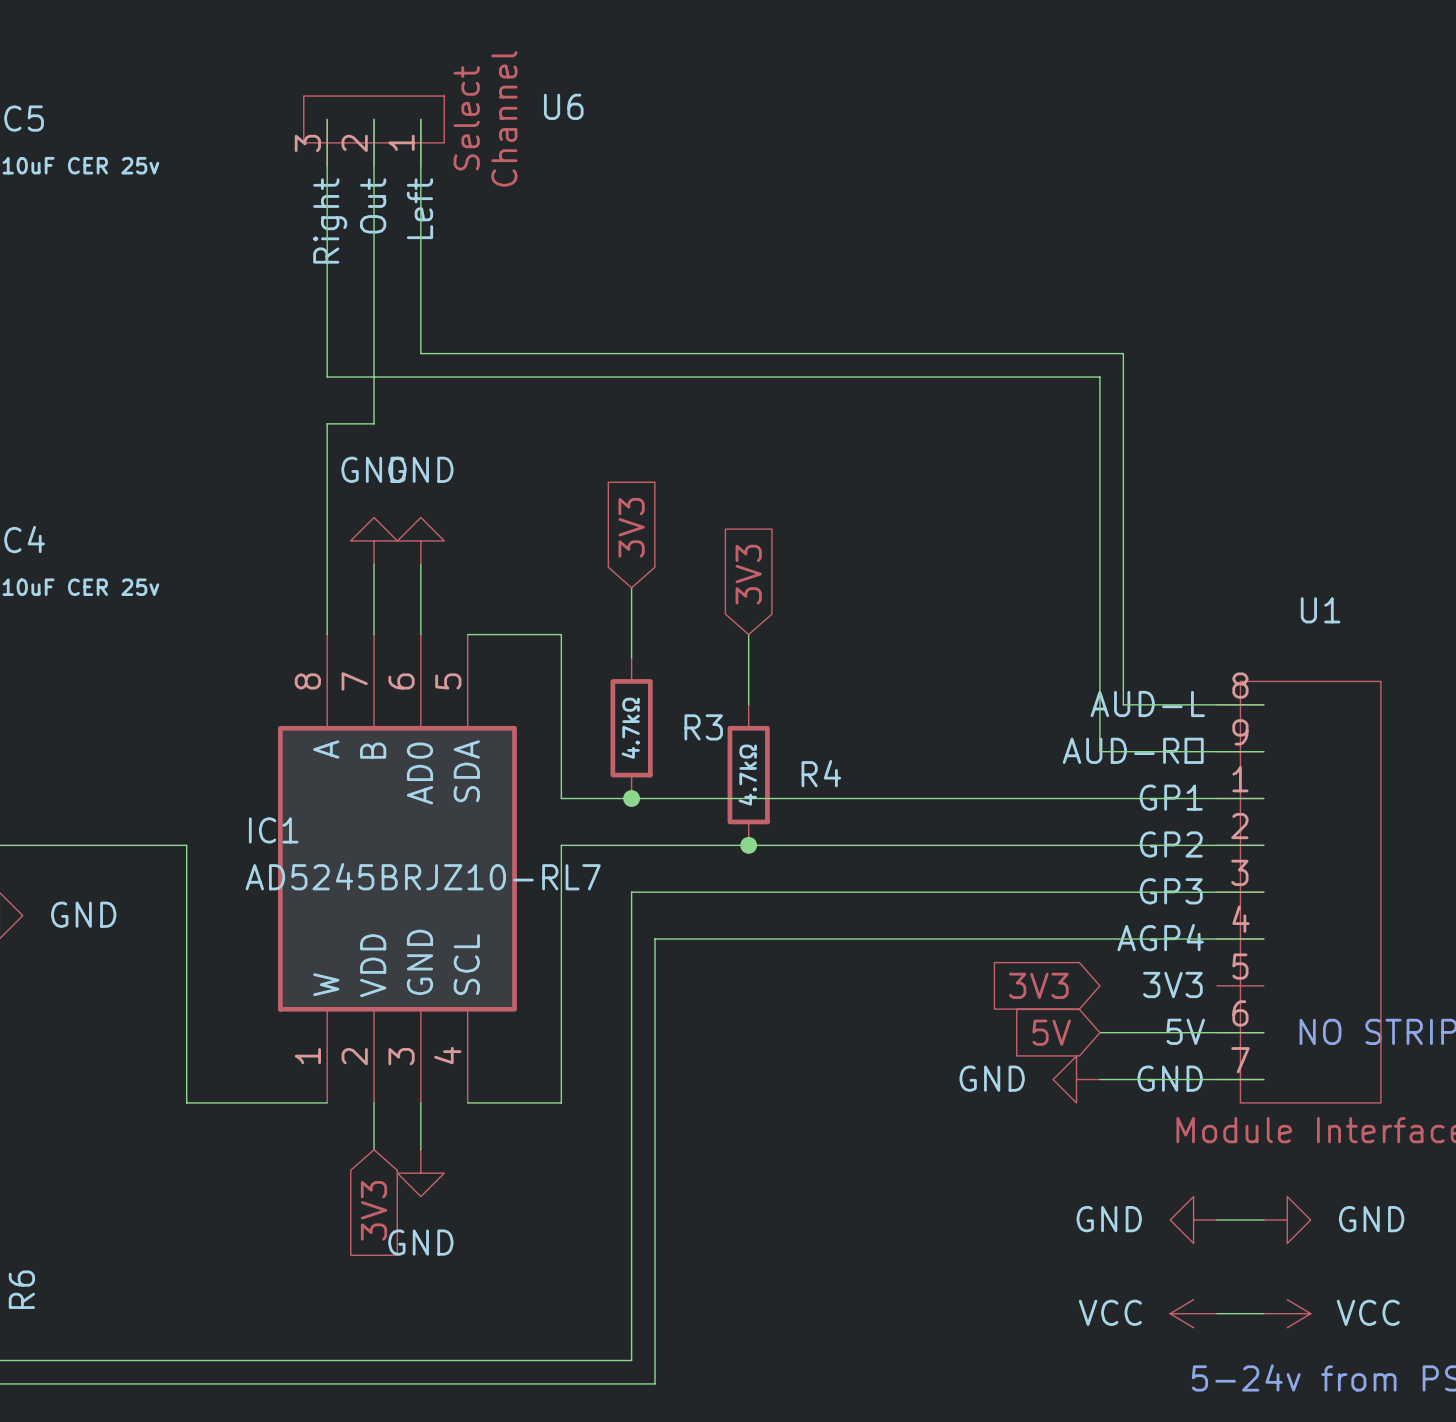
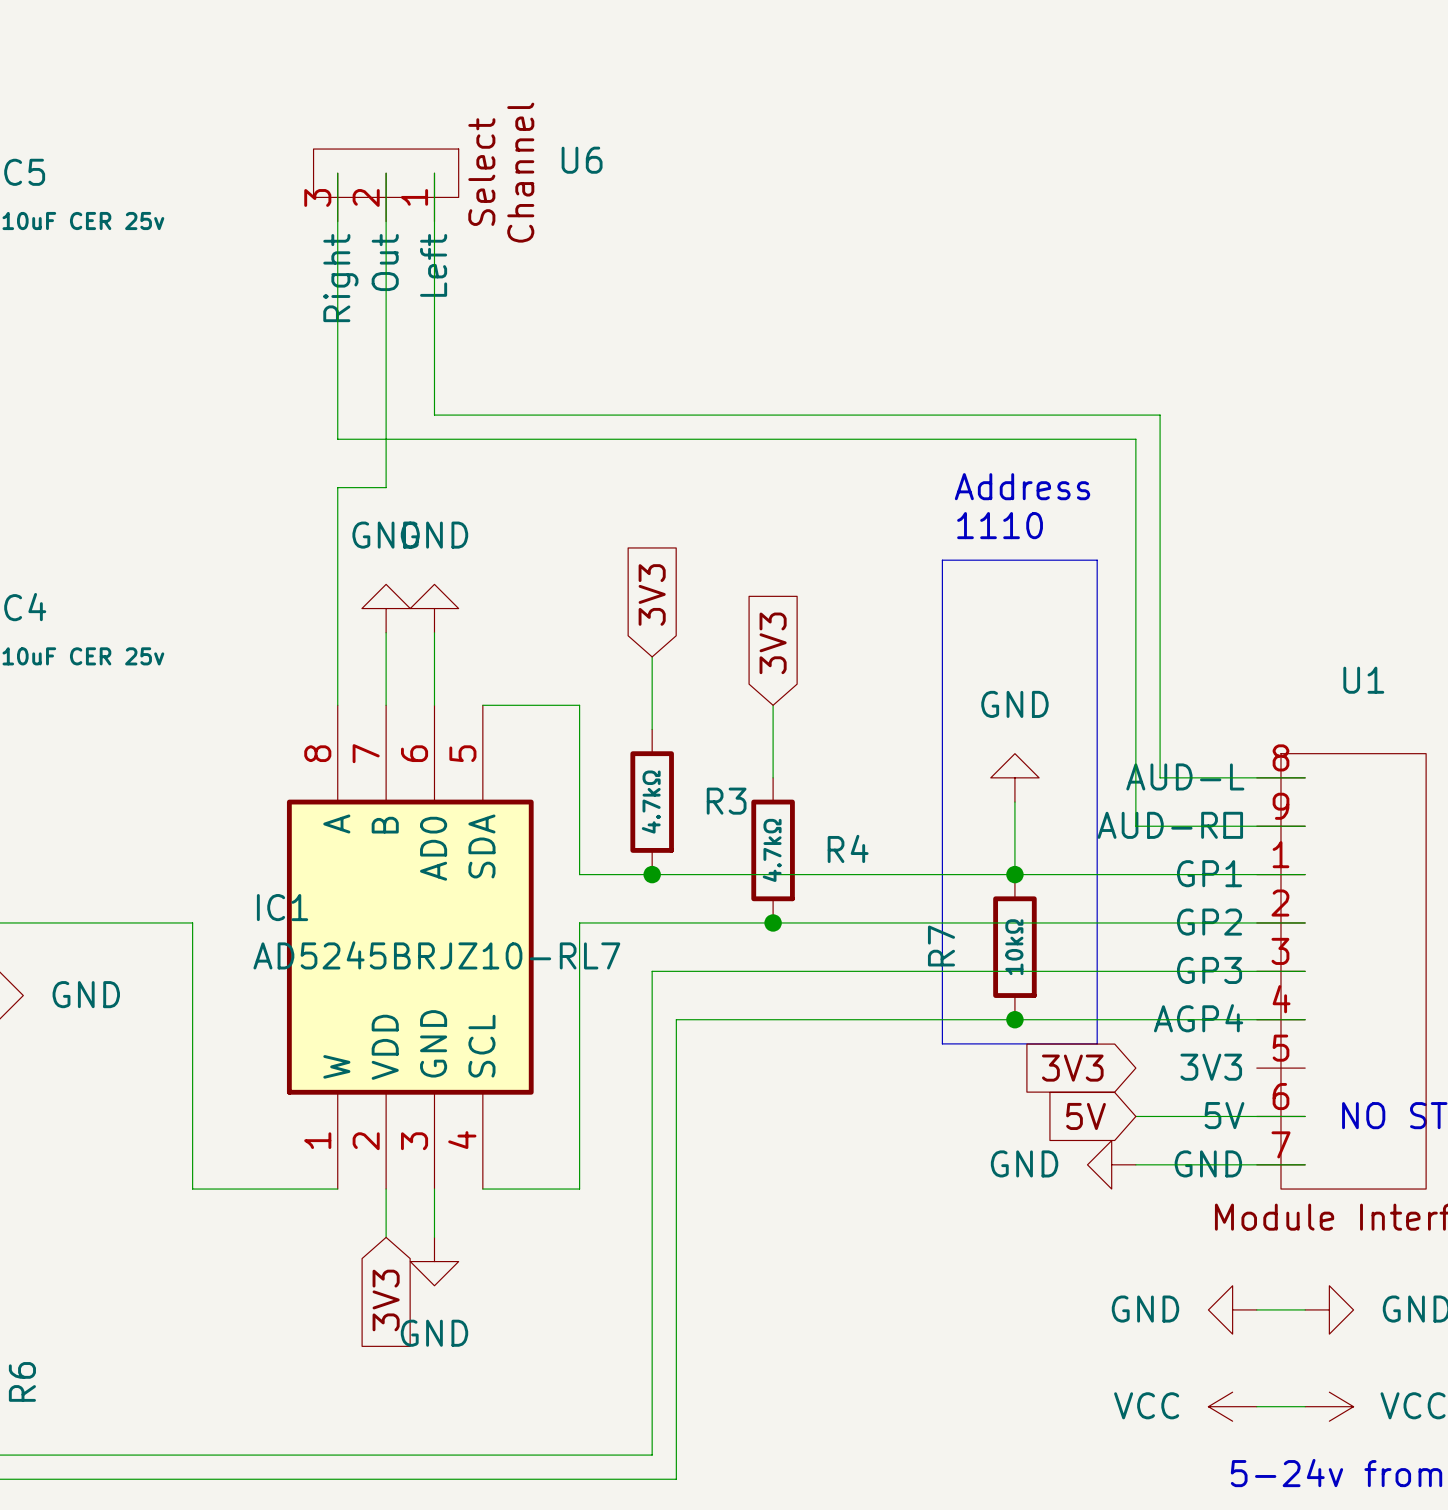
text: none -> Address (1022, 486)
text: none -> 1110 (1000, 525)
line: none -> (942, 560) (1097, 560) (1097, 1043) (942, 1043) (942, 560)
power symbol: none -> GND (1014, 777)
wire: none -> (1014, 802) (1014, 874)
junction: none -> (1014, 874)
R7: none -> 10kΩ (1014, 947)
junction: none -> (1014, 1019)

